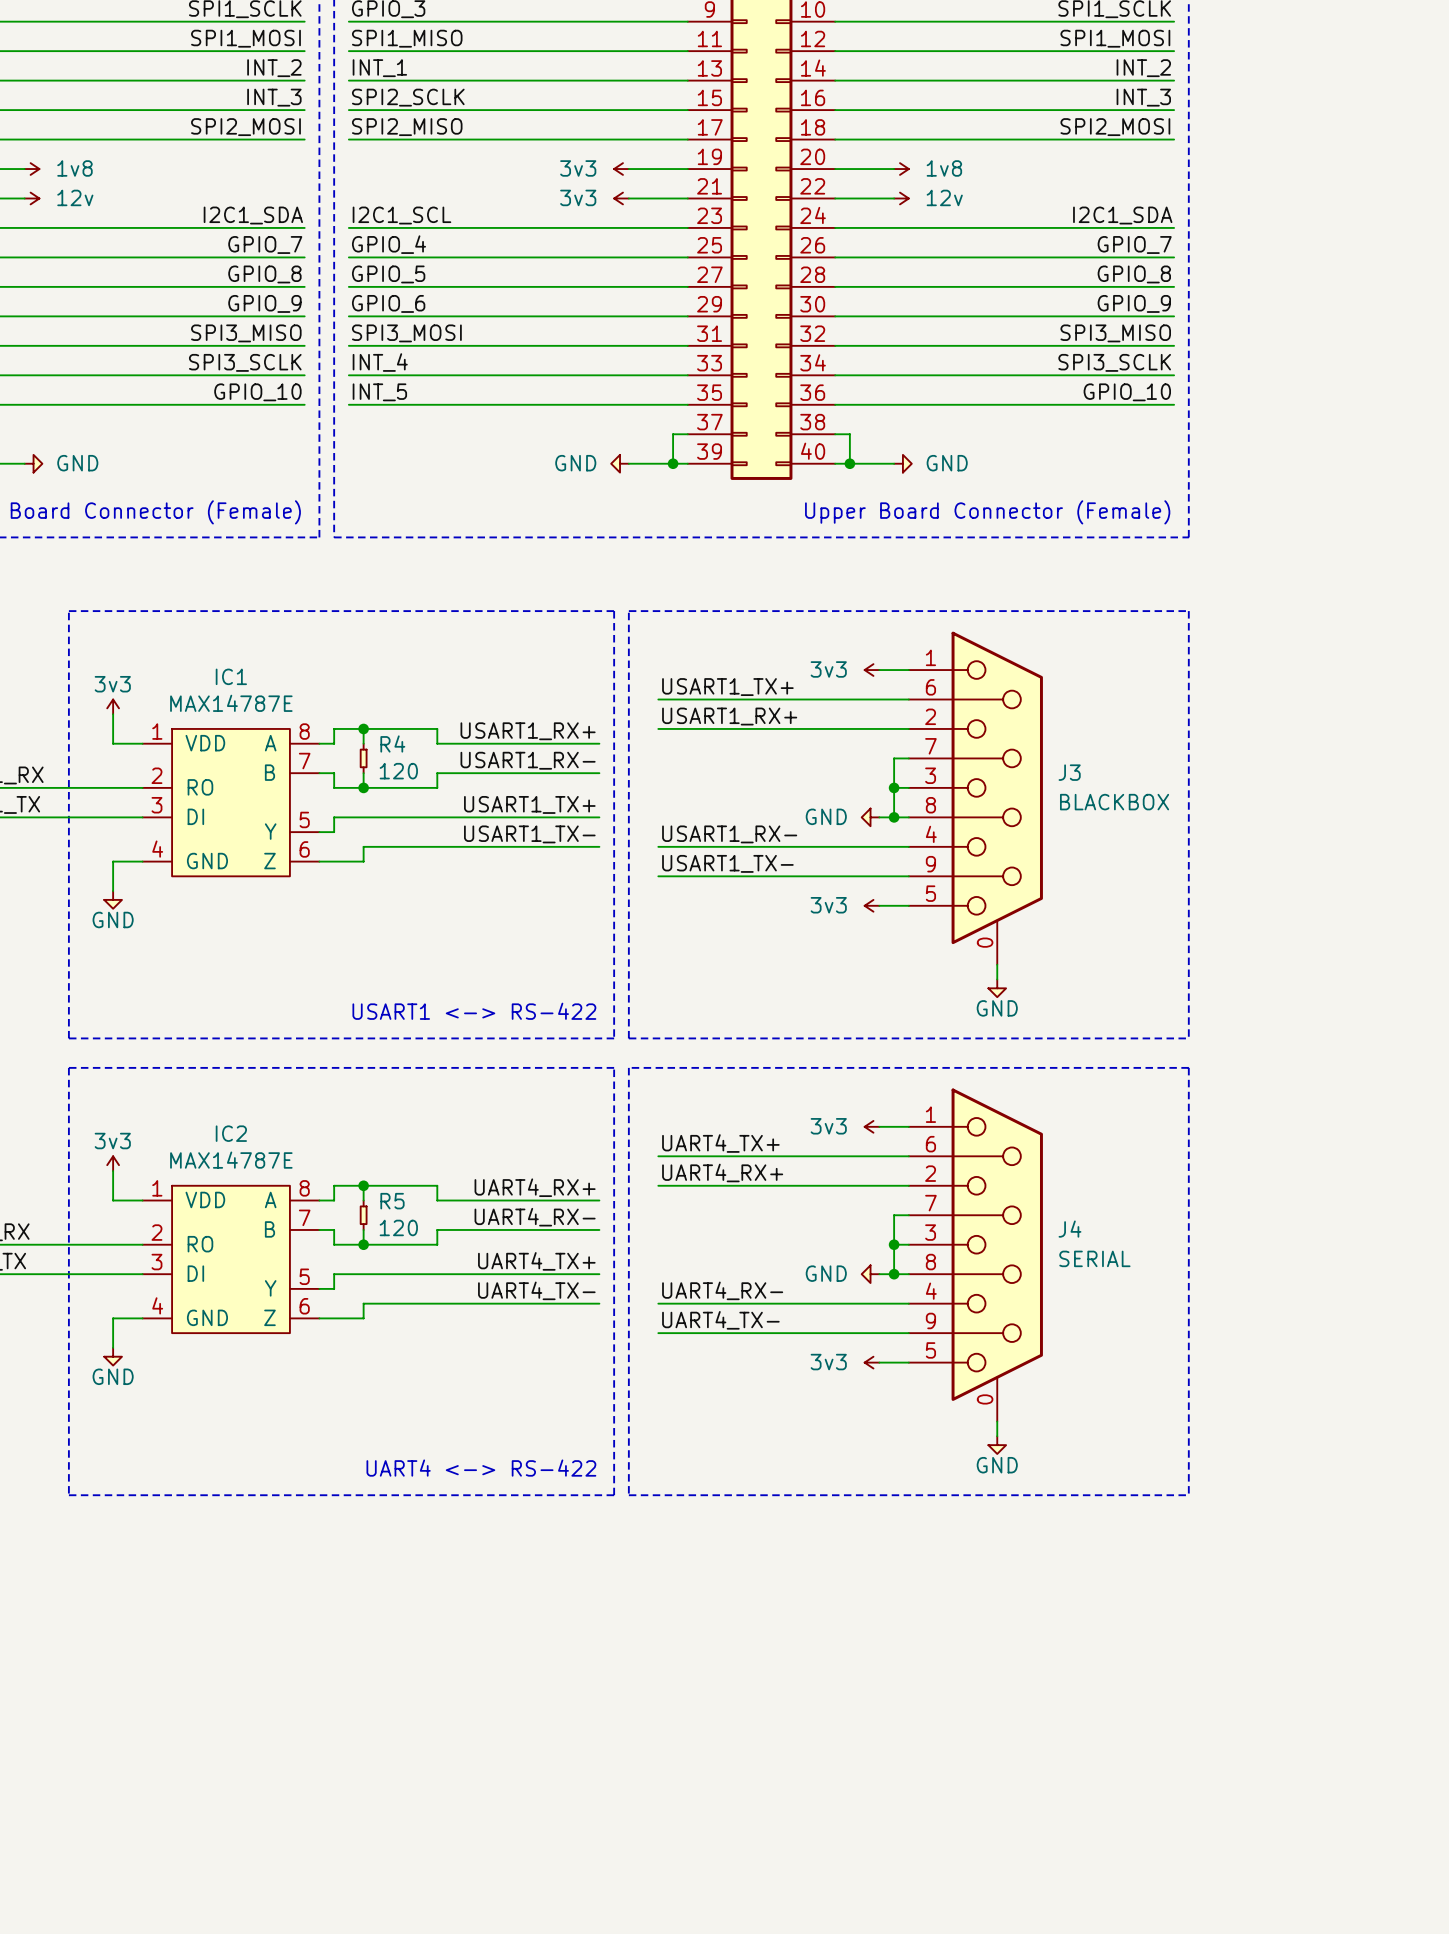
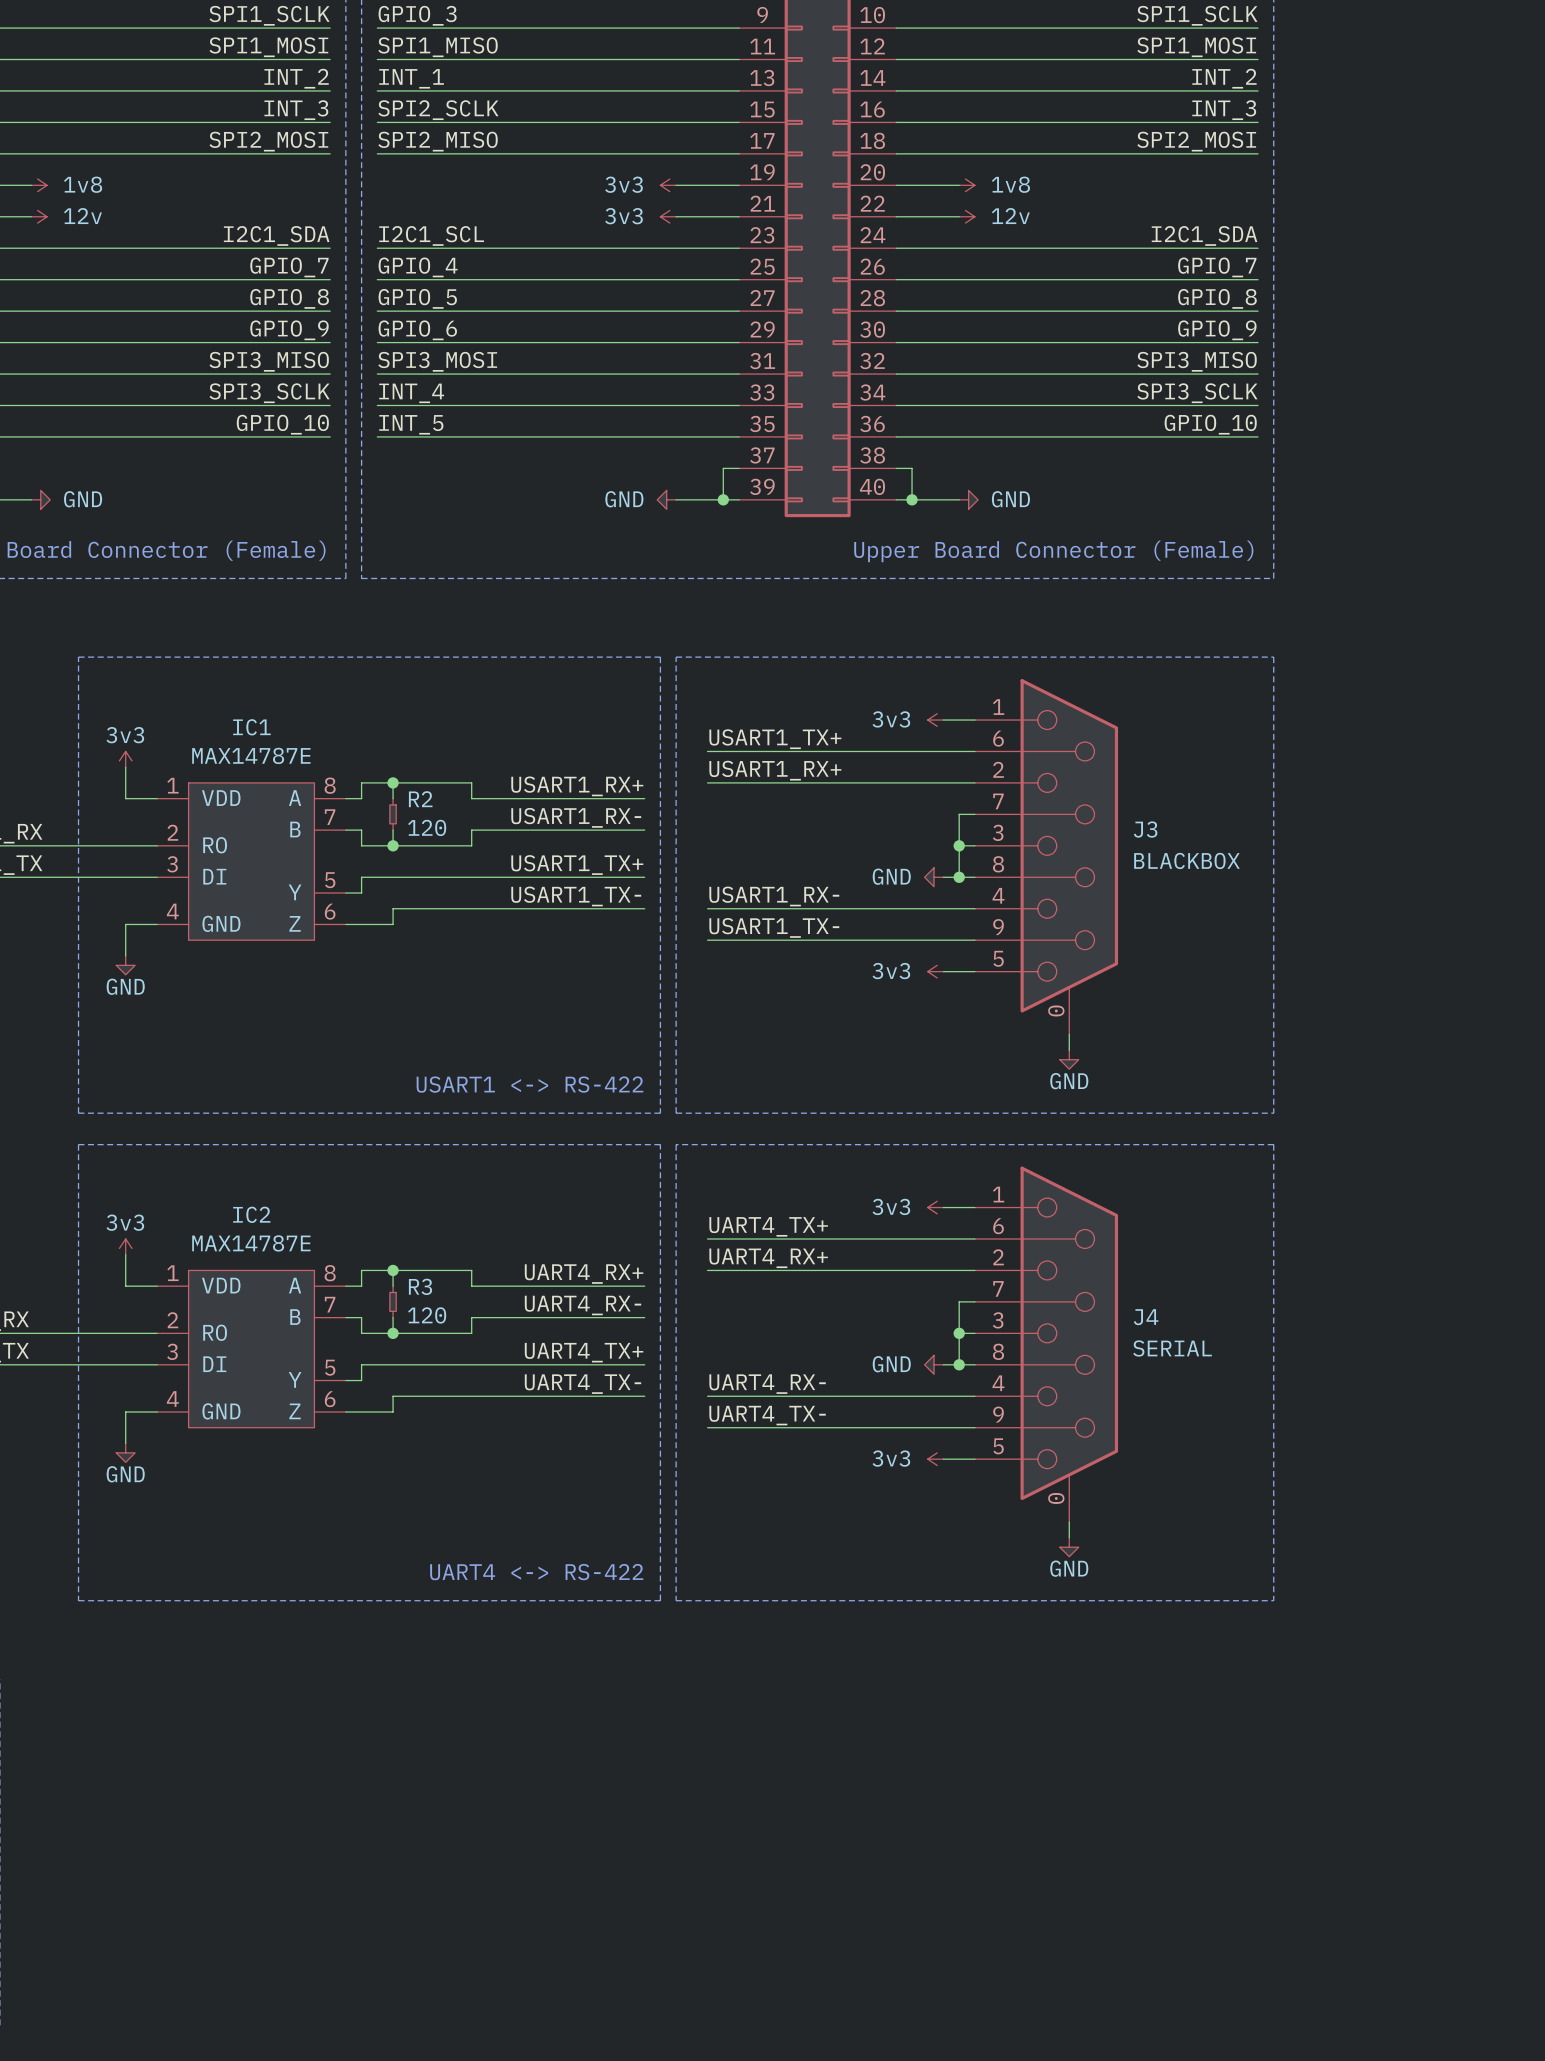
R4 name: R4 (392, 743) -> R2 (420, 799)
R5 name: R5 (392, 1201) -> R3 (420, 1286)

